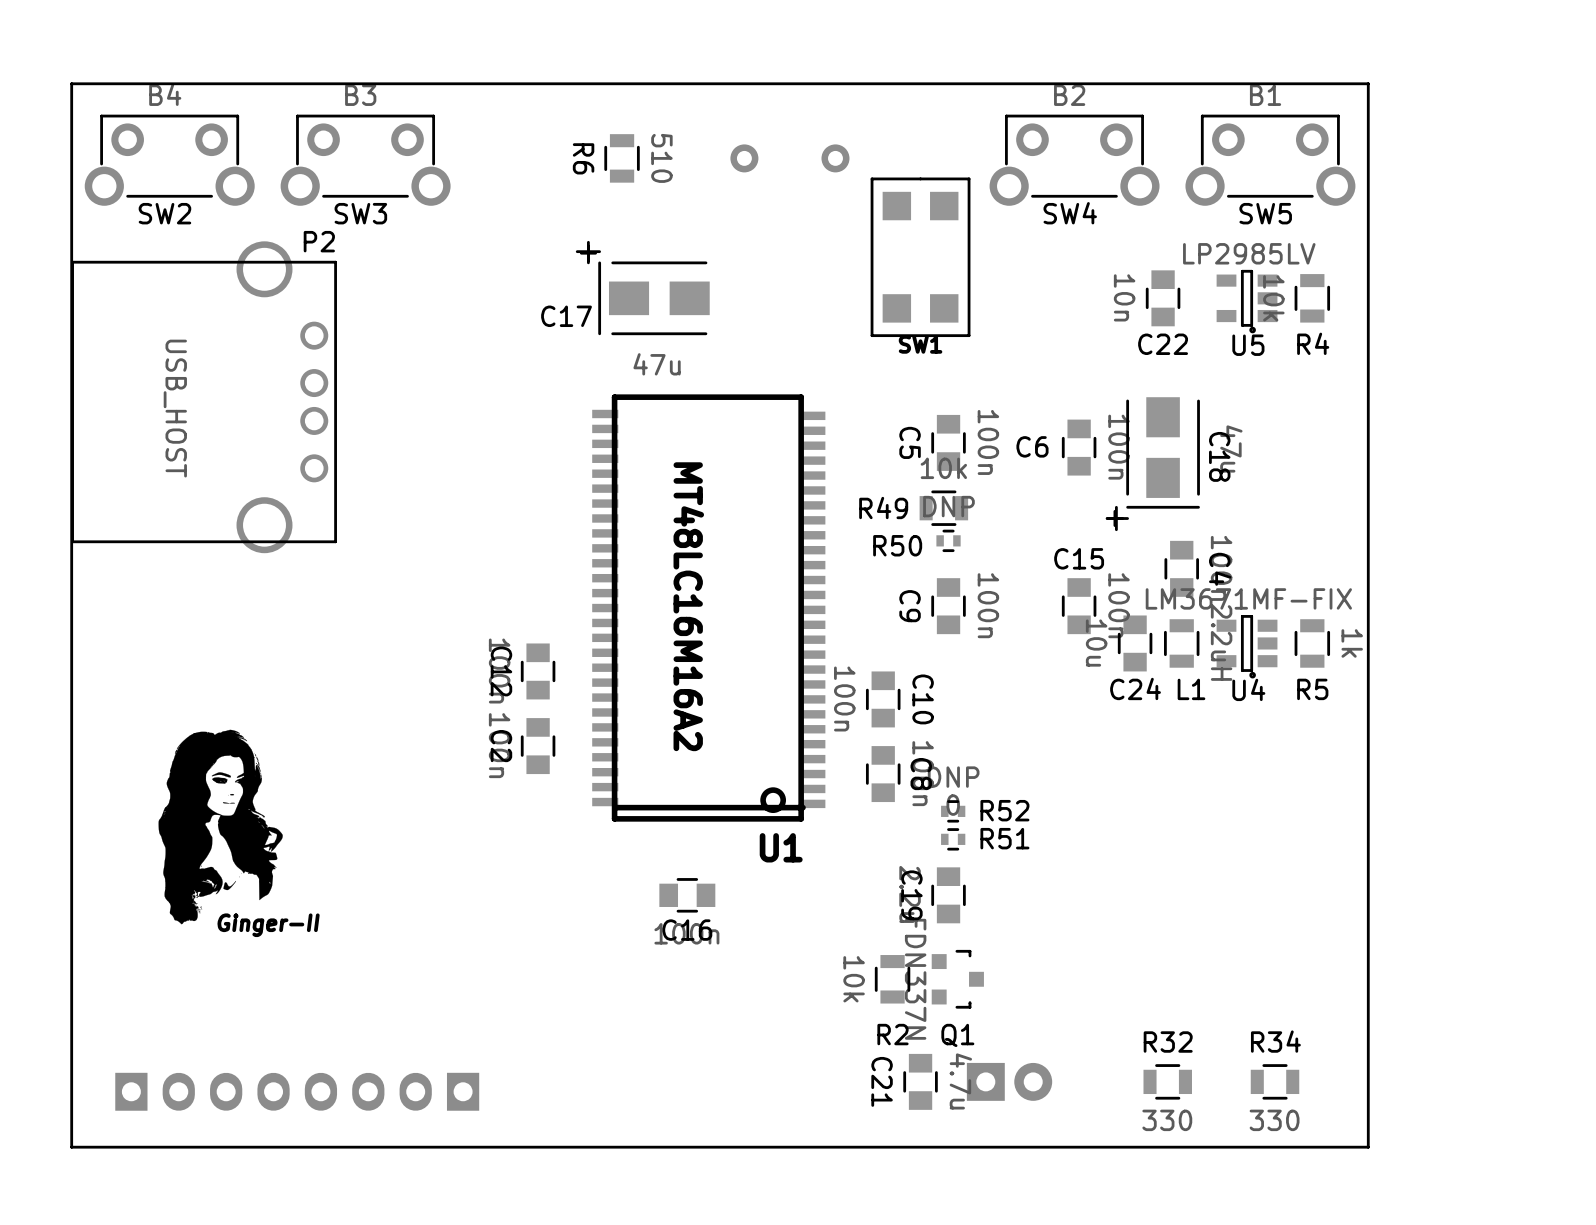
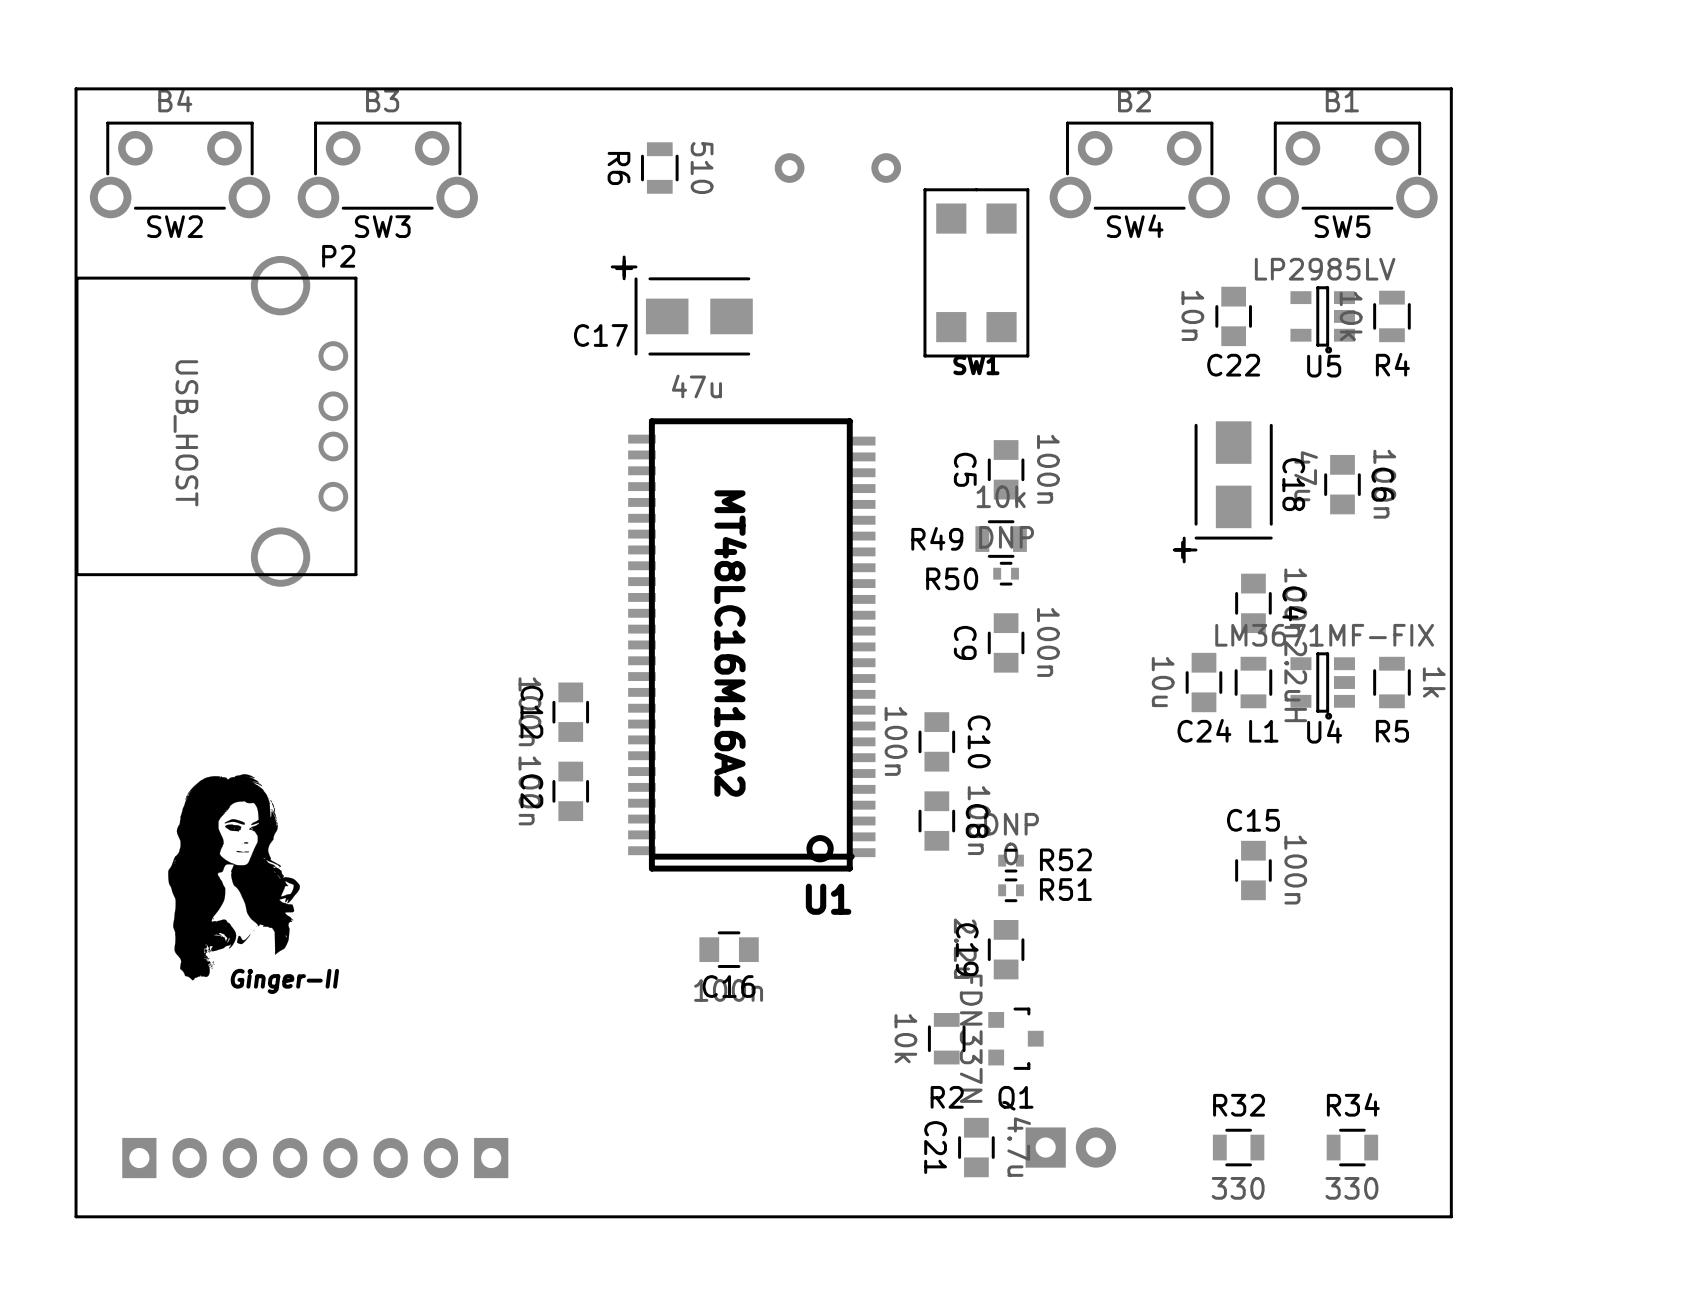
C6 name rotation: 0° (1032, 446) -> 90° clockwise (1382, 484)
C6 name position: C6 (1032, 446) -> C6 (1382, 484)
C6 position: (1079, 447) -> (1342, 484)
C15 position: (1079, 606) -> (1253, 870)

